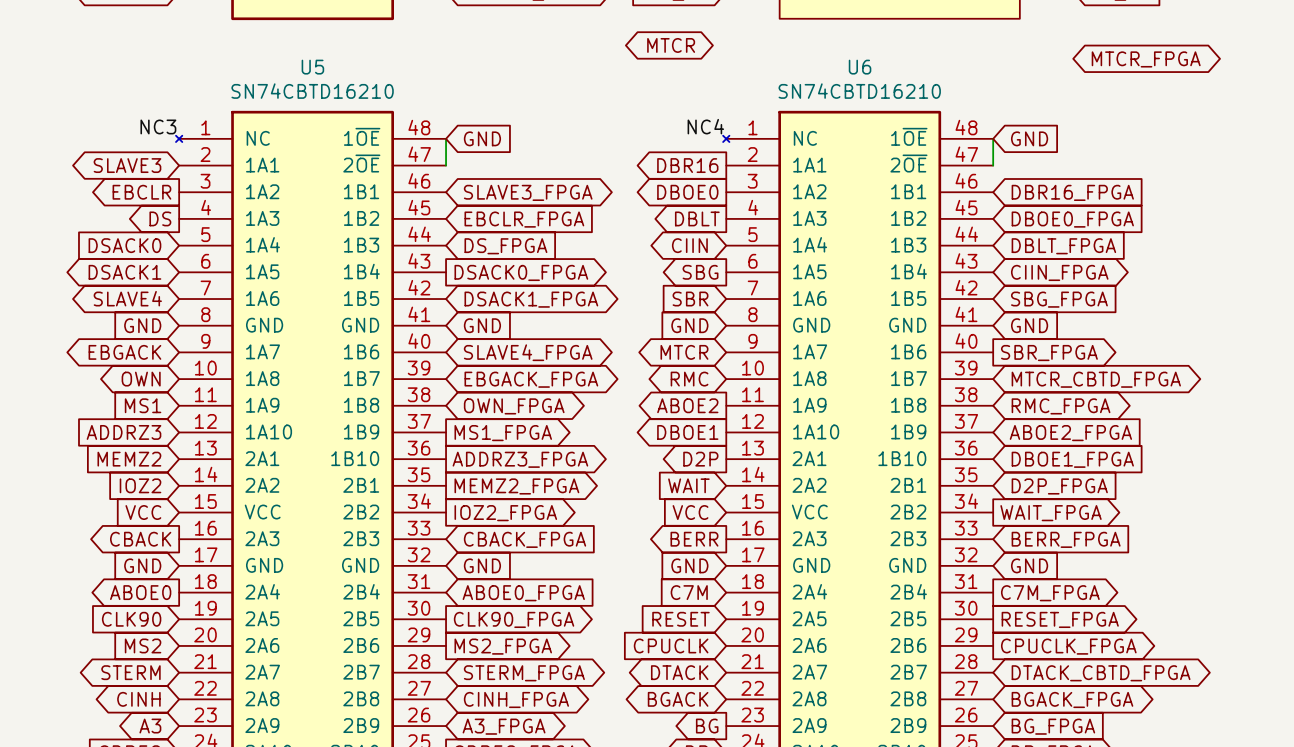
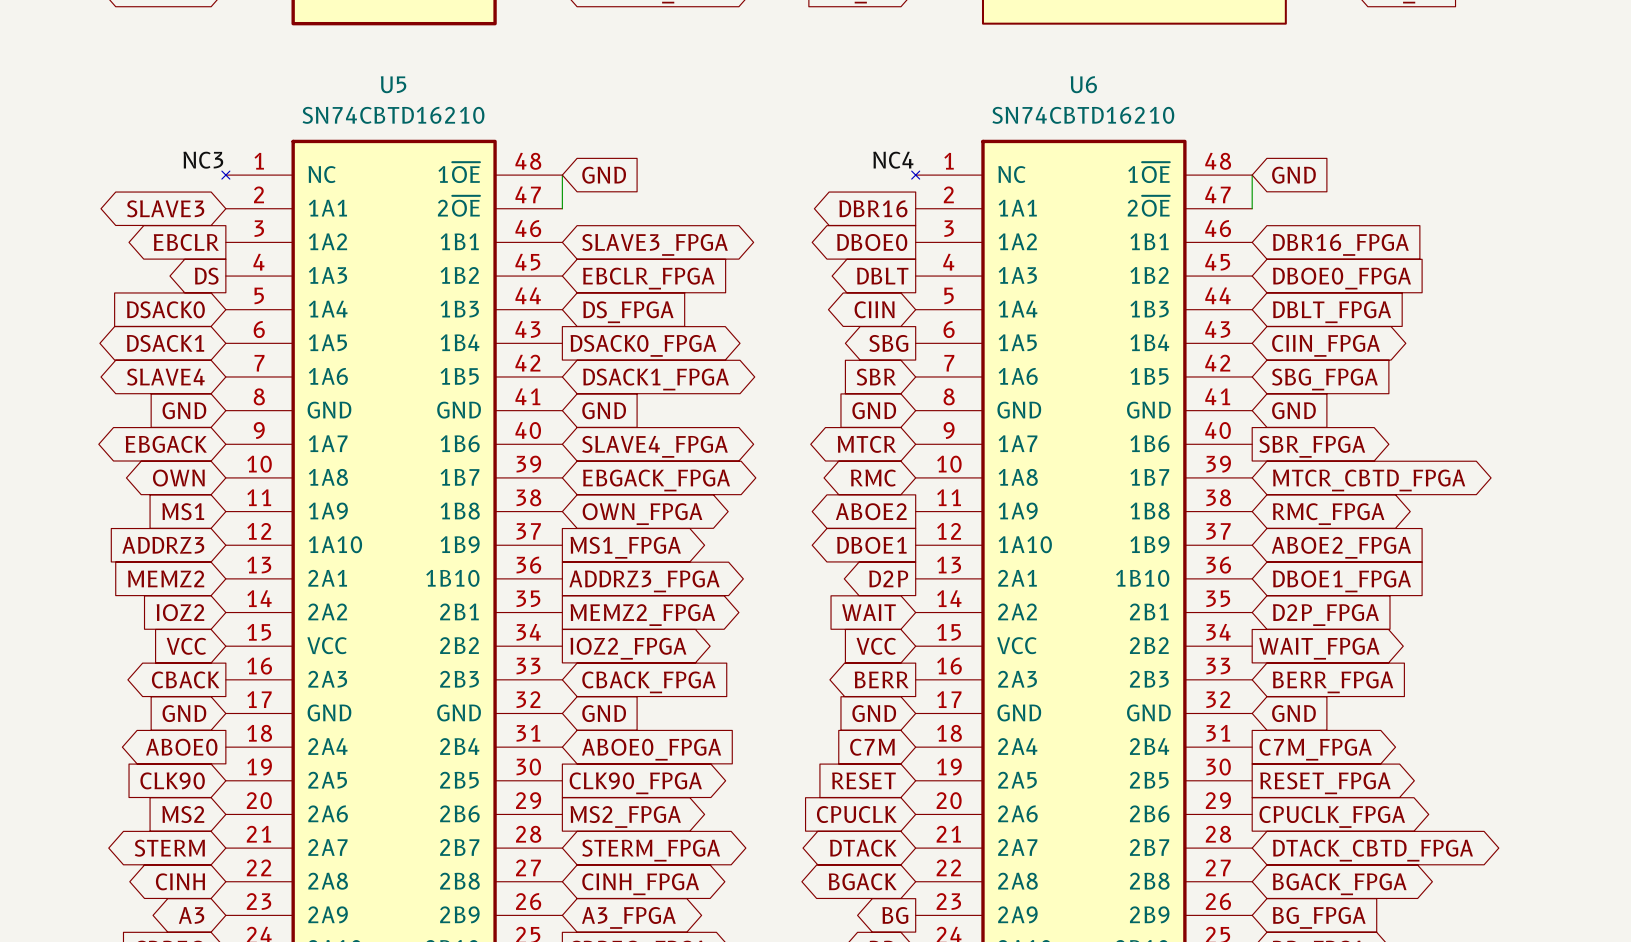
global label: MTCR (671, 45) -> none
global label: MTCR_FPGA (1146, 59) -> none

